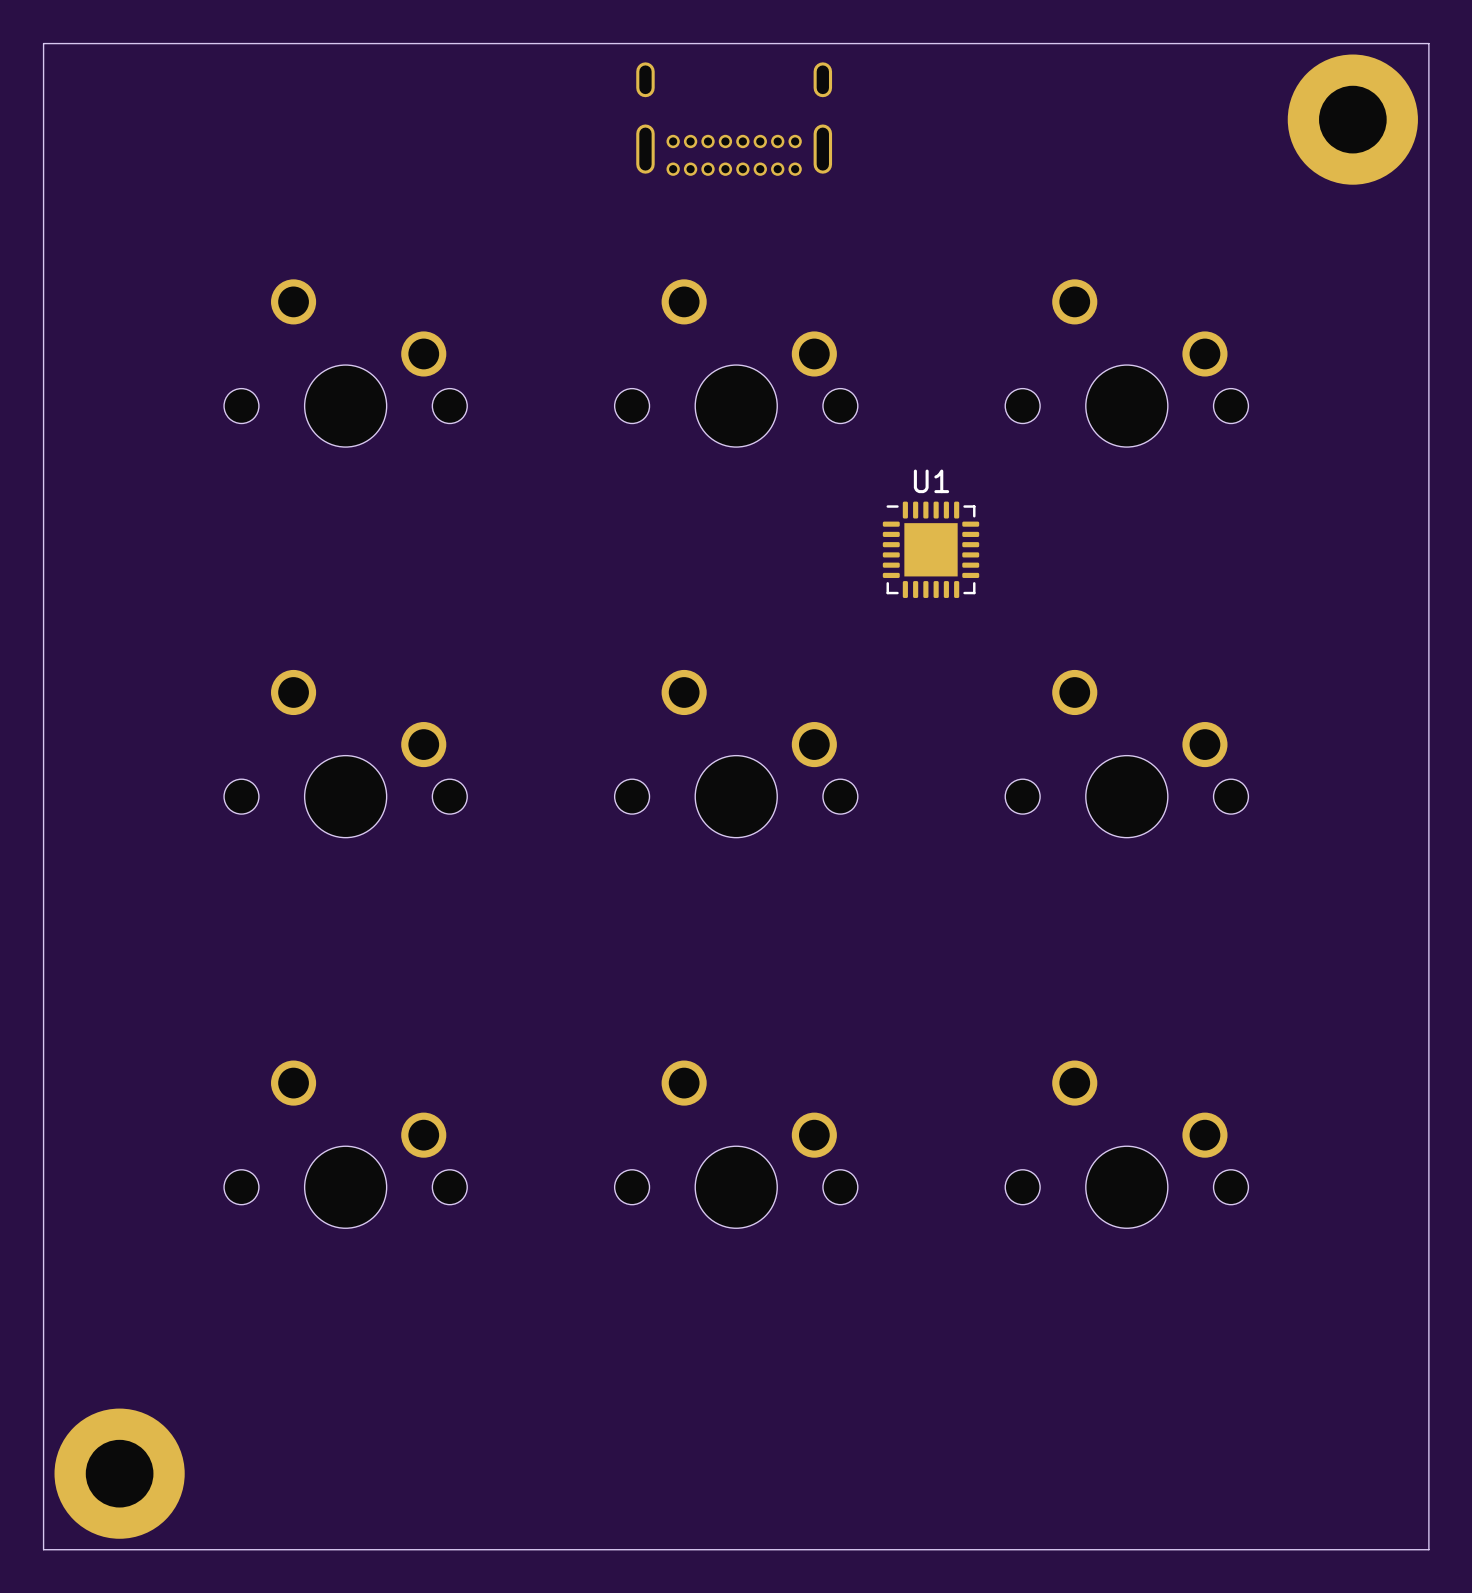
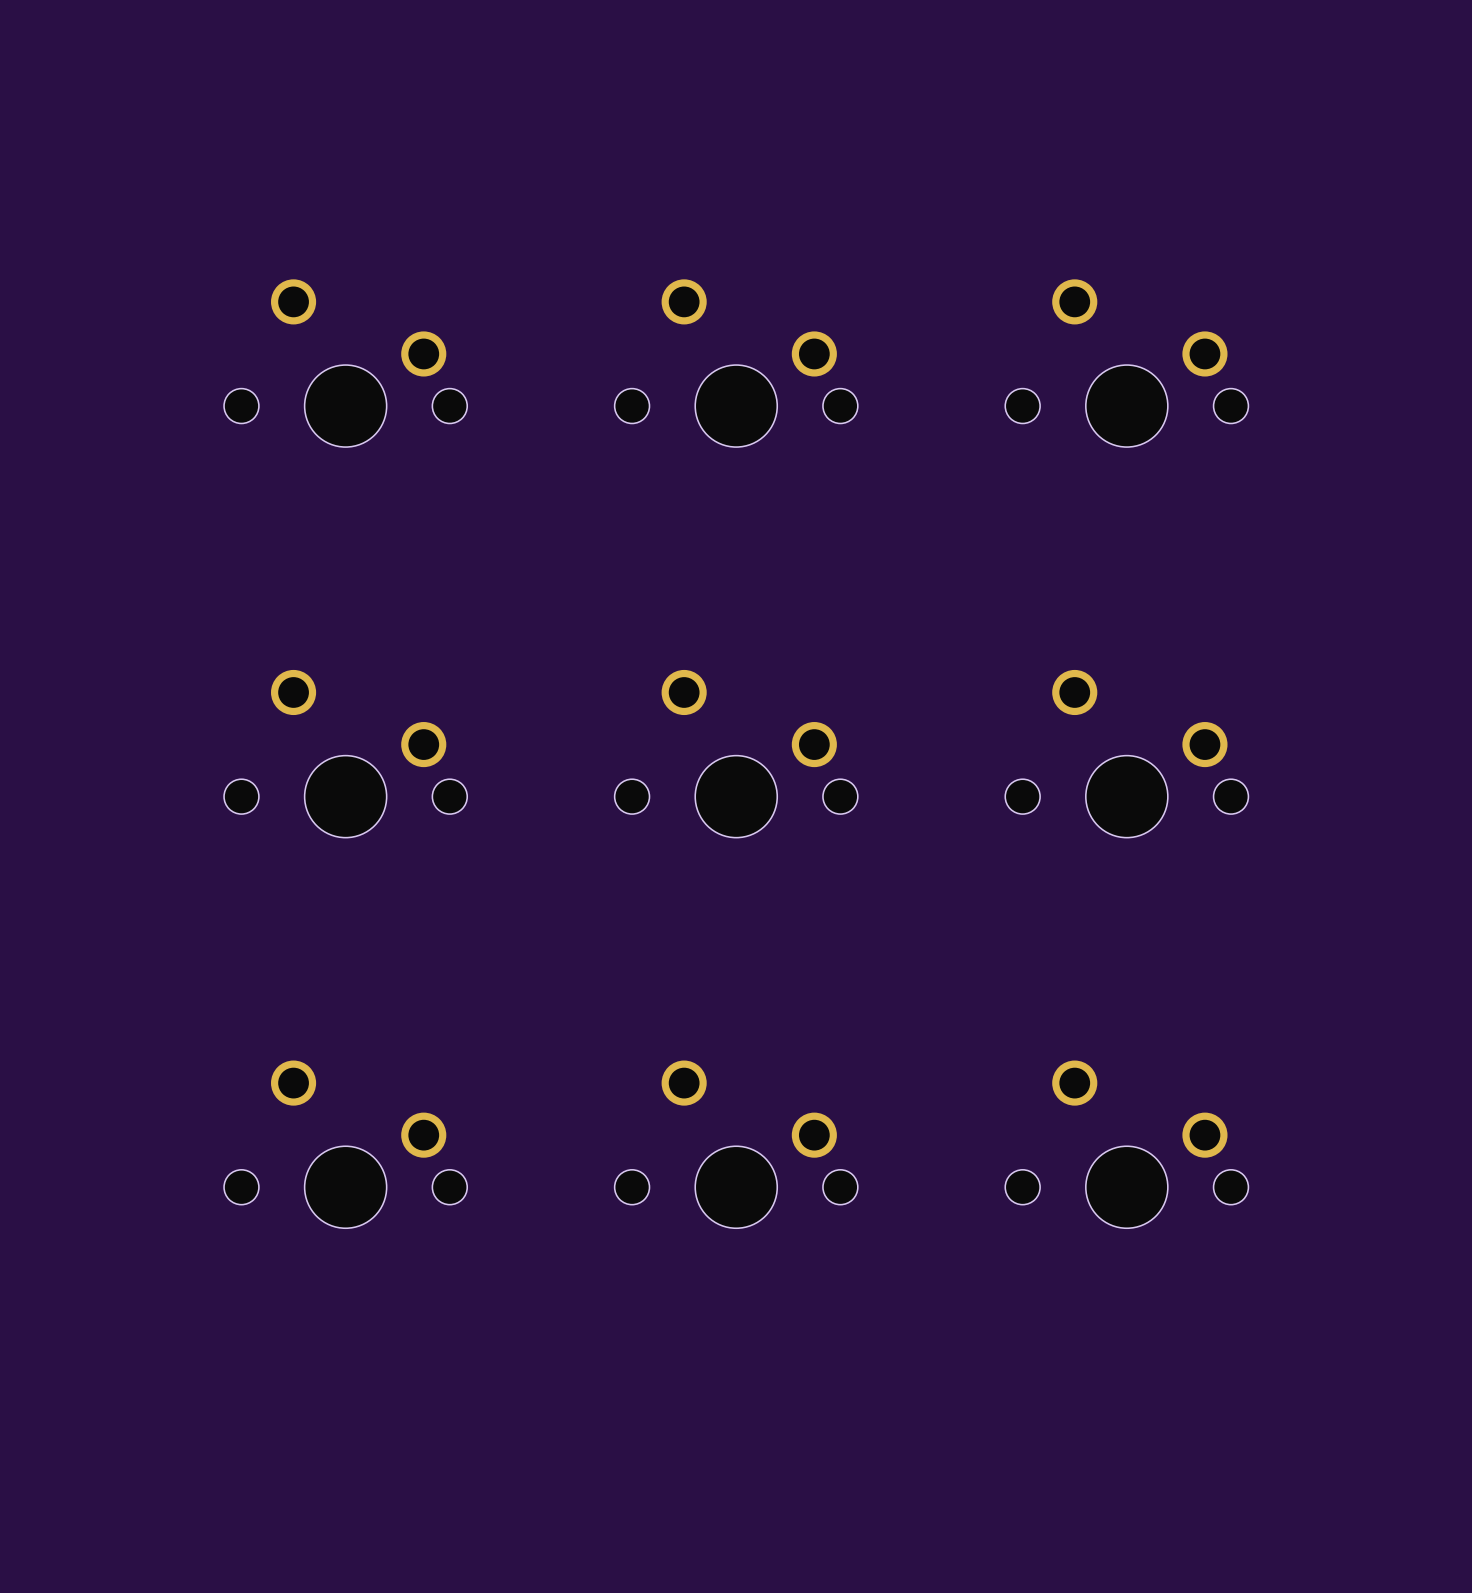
board edge: (1428, 43) (1428, 1549) (43, 1549) (43, 43) (1428, 43) -> none
part: (734, 119) -> none
part: (1352, 119) -> none
U1: (931, 549) -> none
part: (119, 1473) -> none

